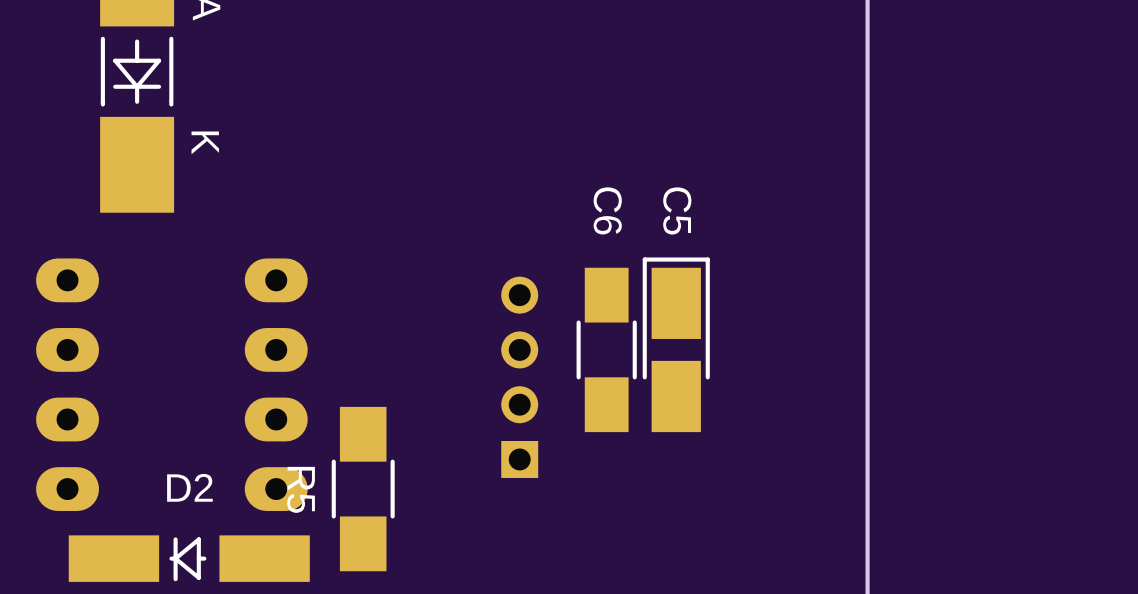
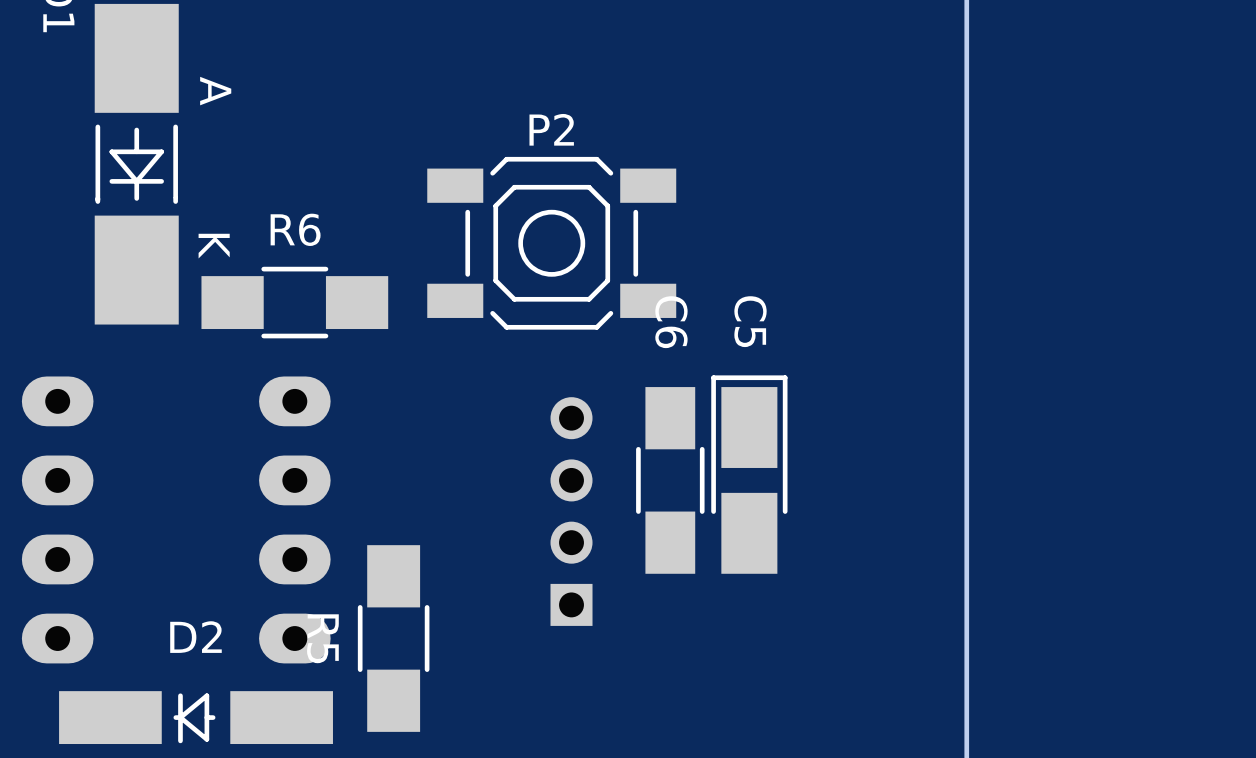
P2: none -> (551, 243)
R6: none -> (294, 302)

